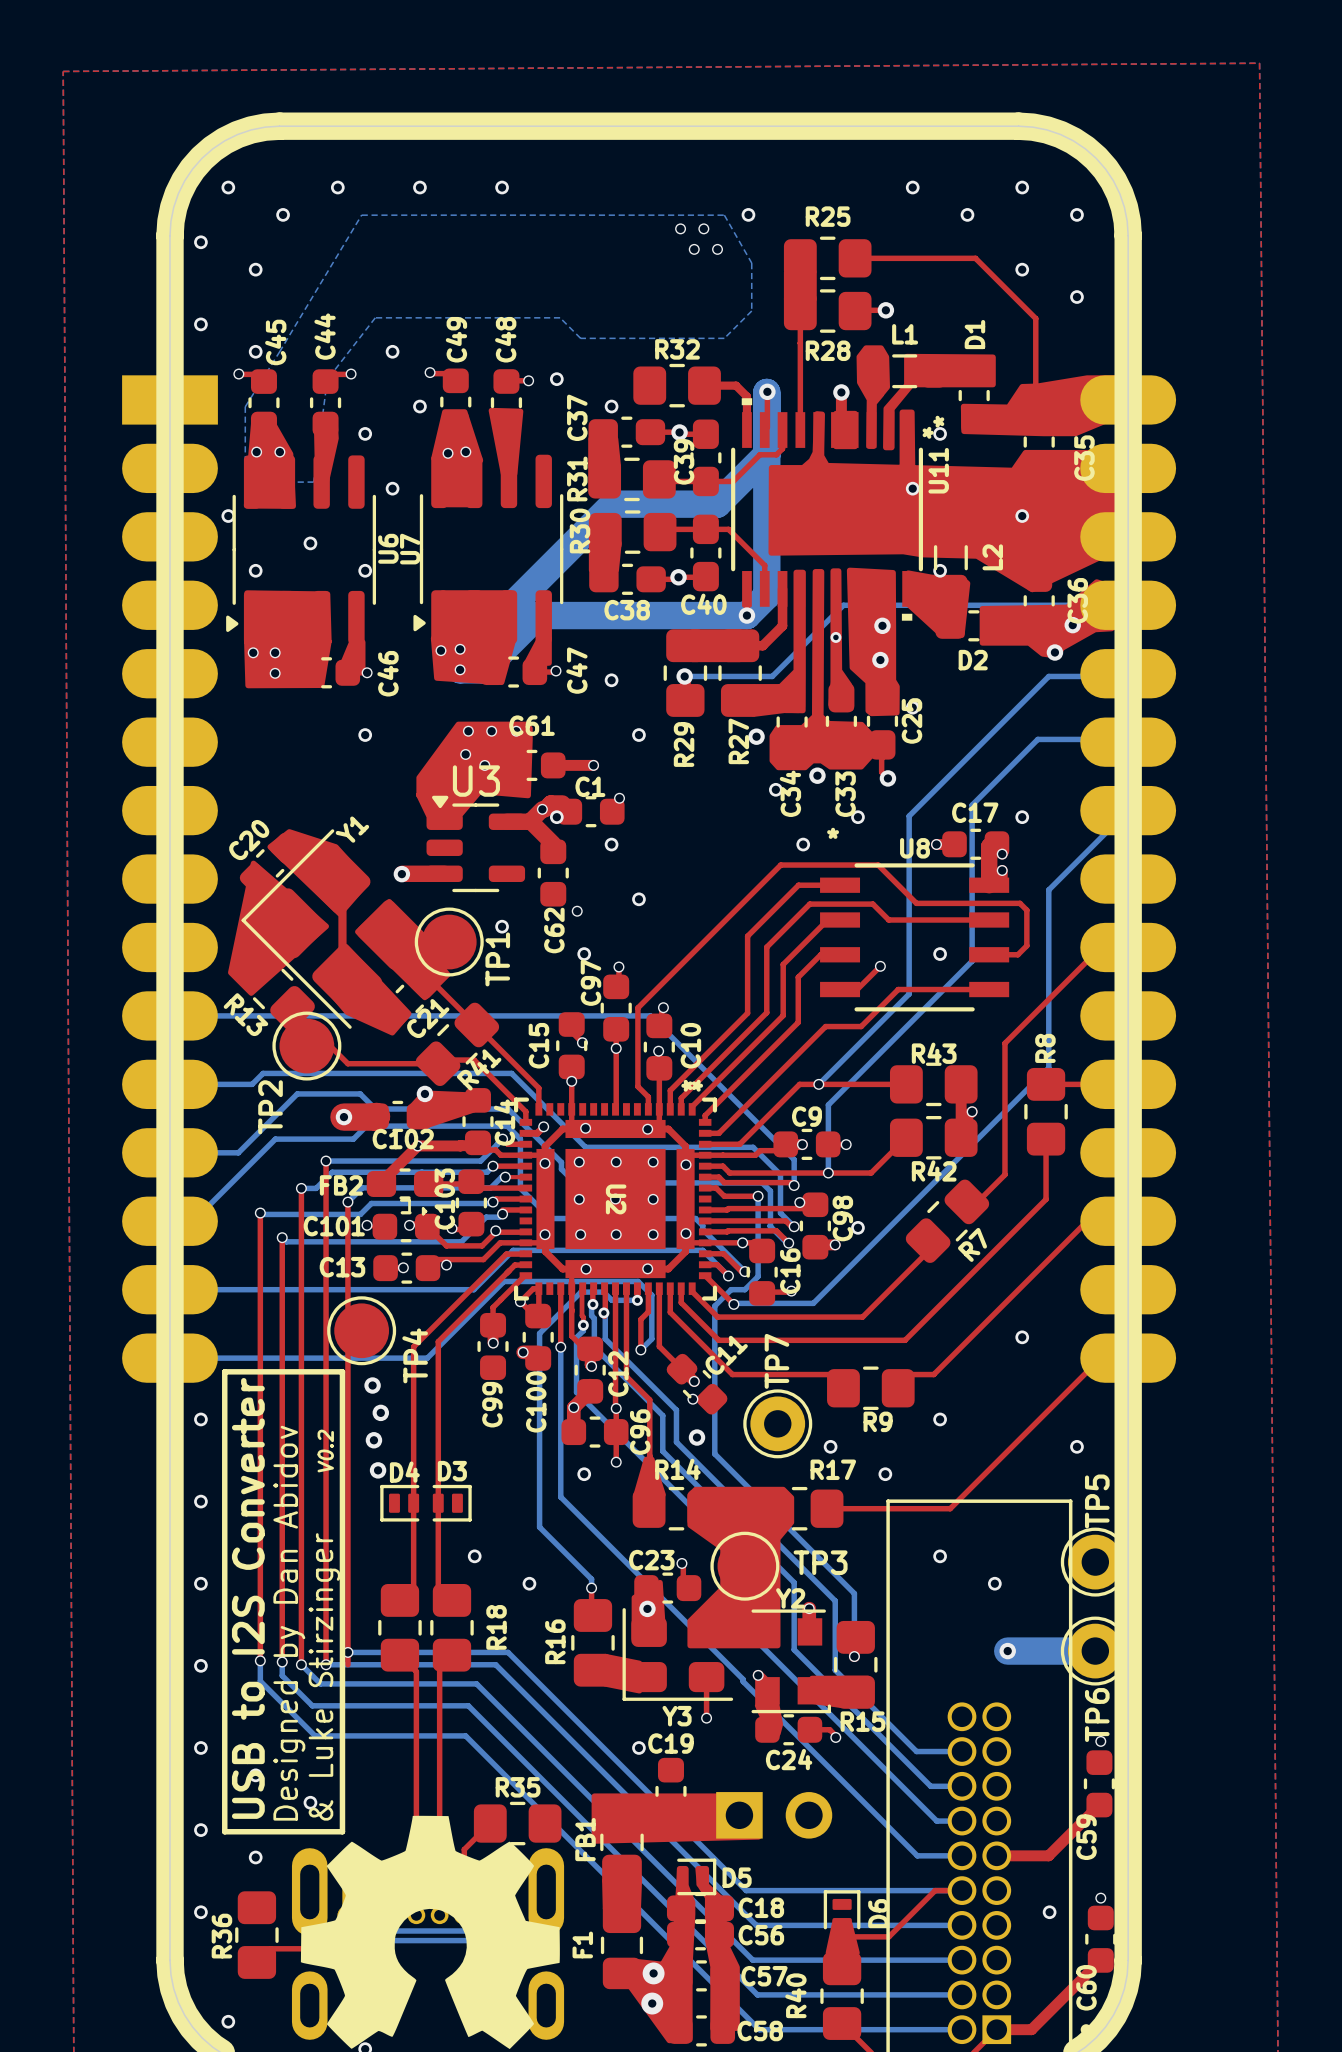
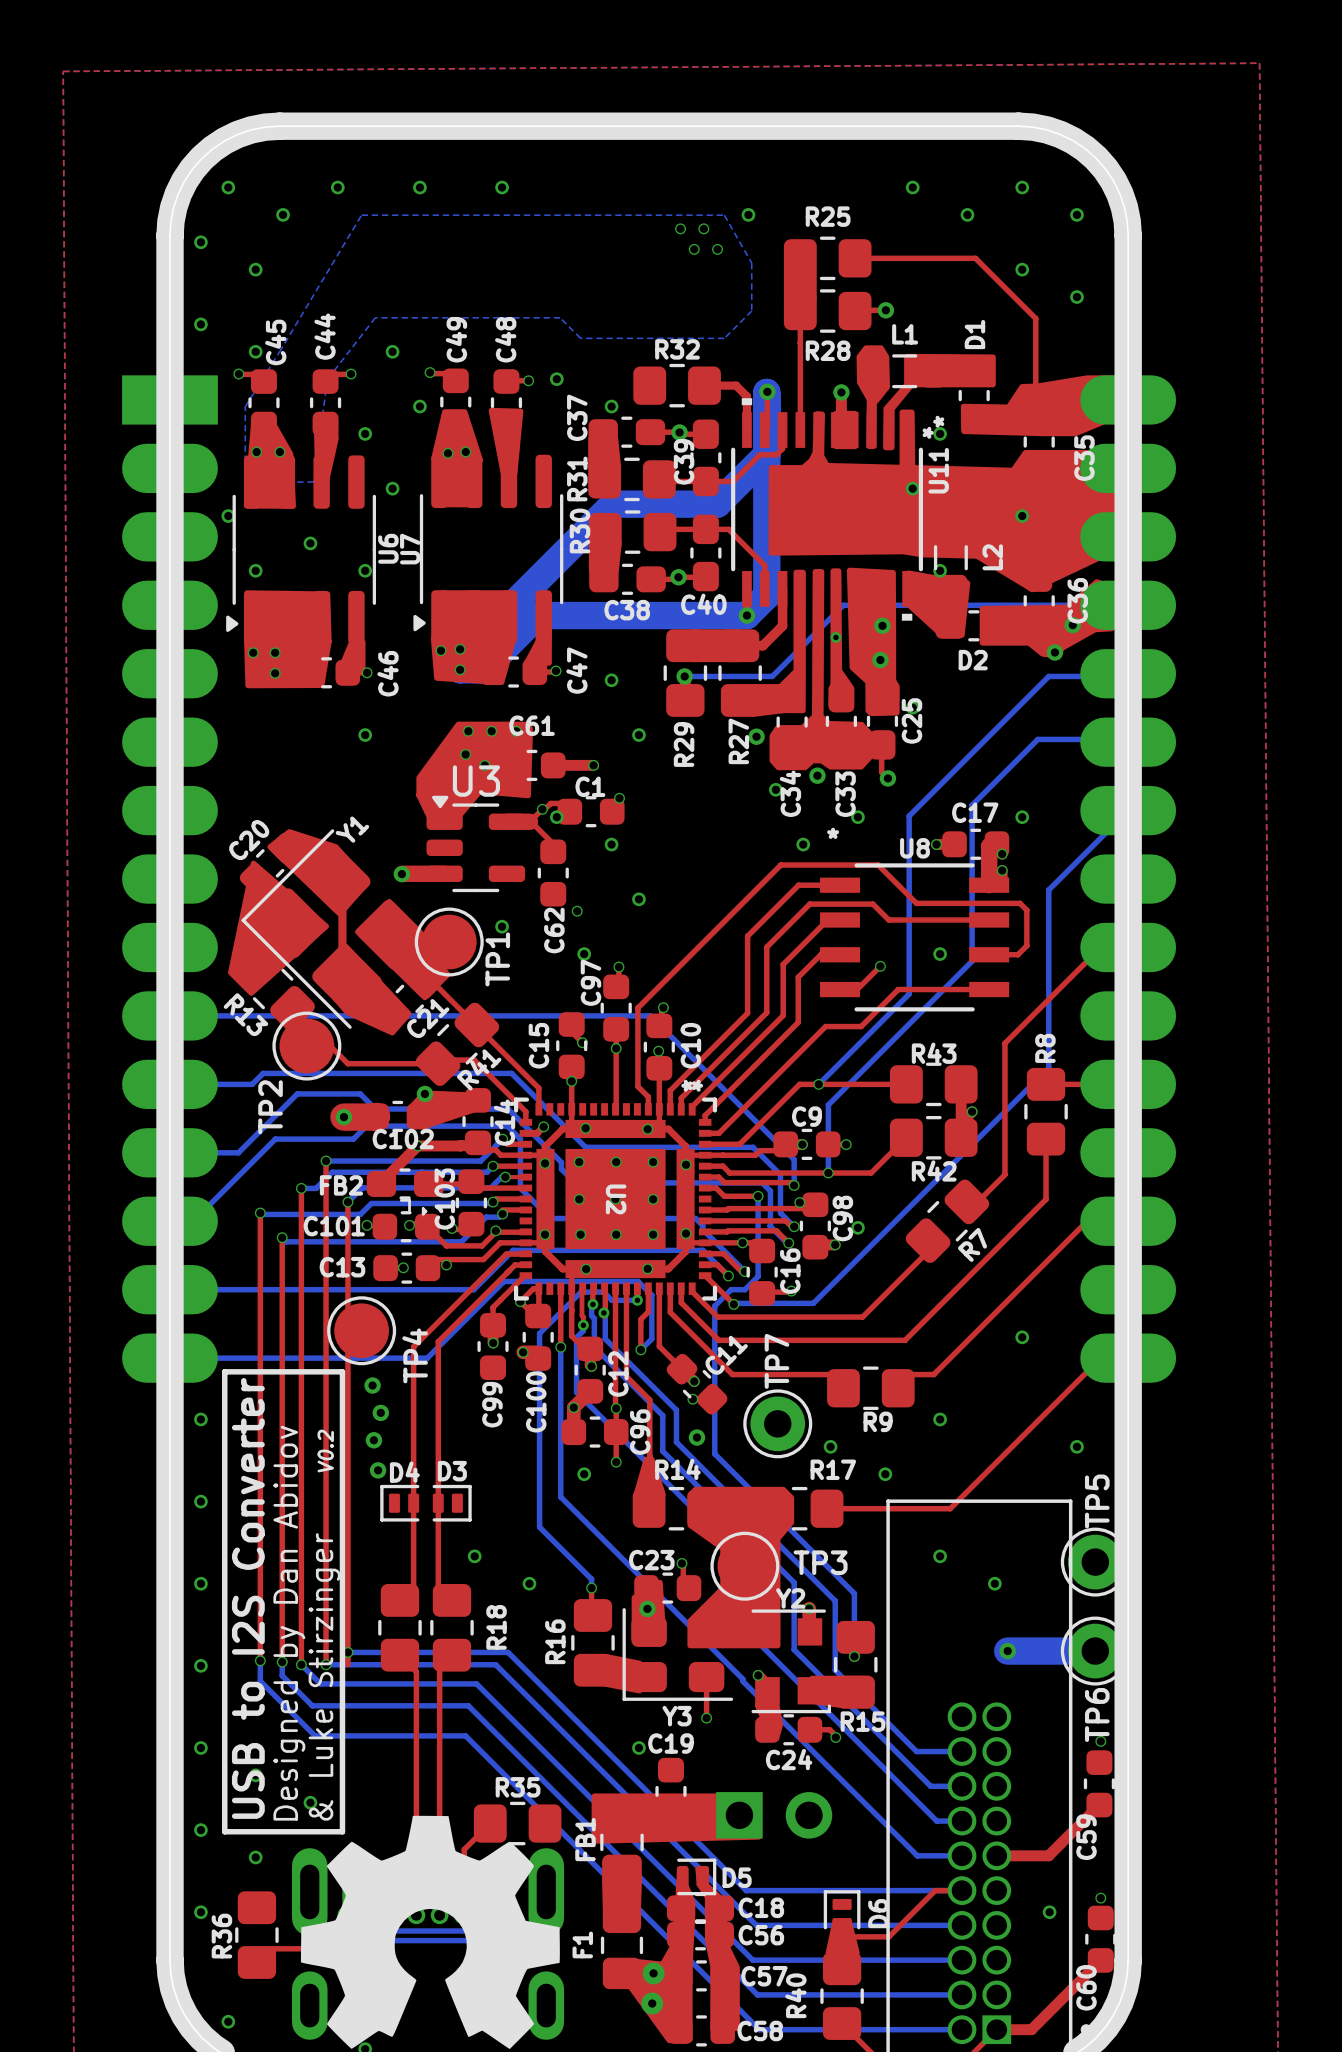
top track width: thick (562, 803) (550, 803) (544, 809) -> thin (562, 803) (550, 803) (544, 809)
top track width: thick (542, 809) (529, 821) (553, 844) -> thin (542, 809) (529, 821) (553, 844)

